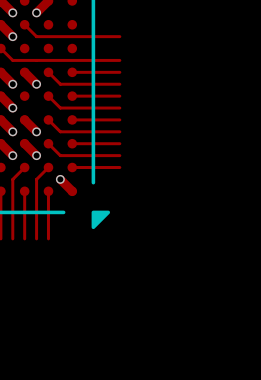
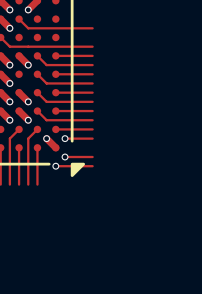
track: none -> (65, 138) (92, 138)
via: none -> (65, 138)
track: none -> (65, 157) (92, 157)
via: none -> (65, 157)
track: none -> (55, 166) (92, 166)
via: none -> (55, 166)

